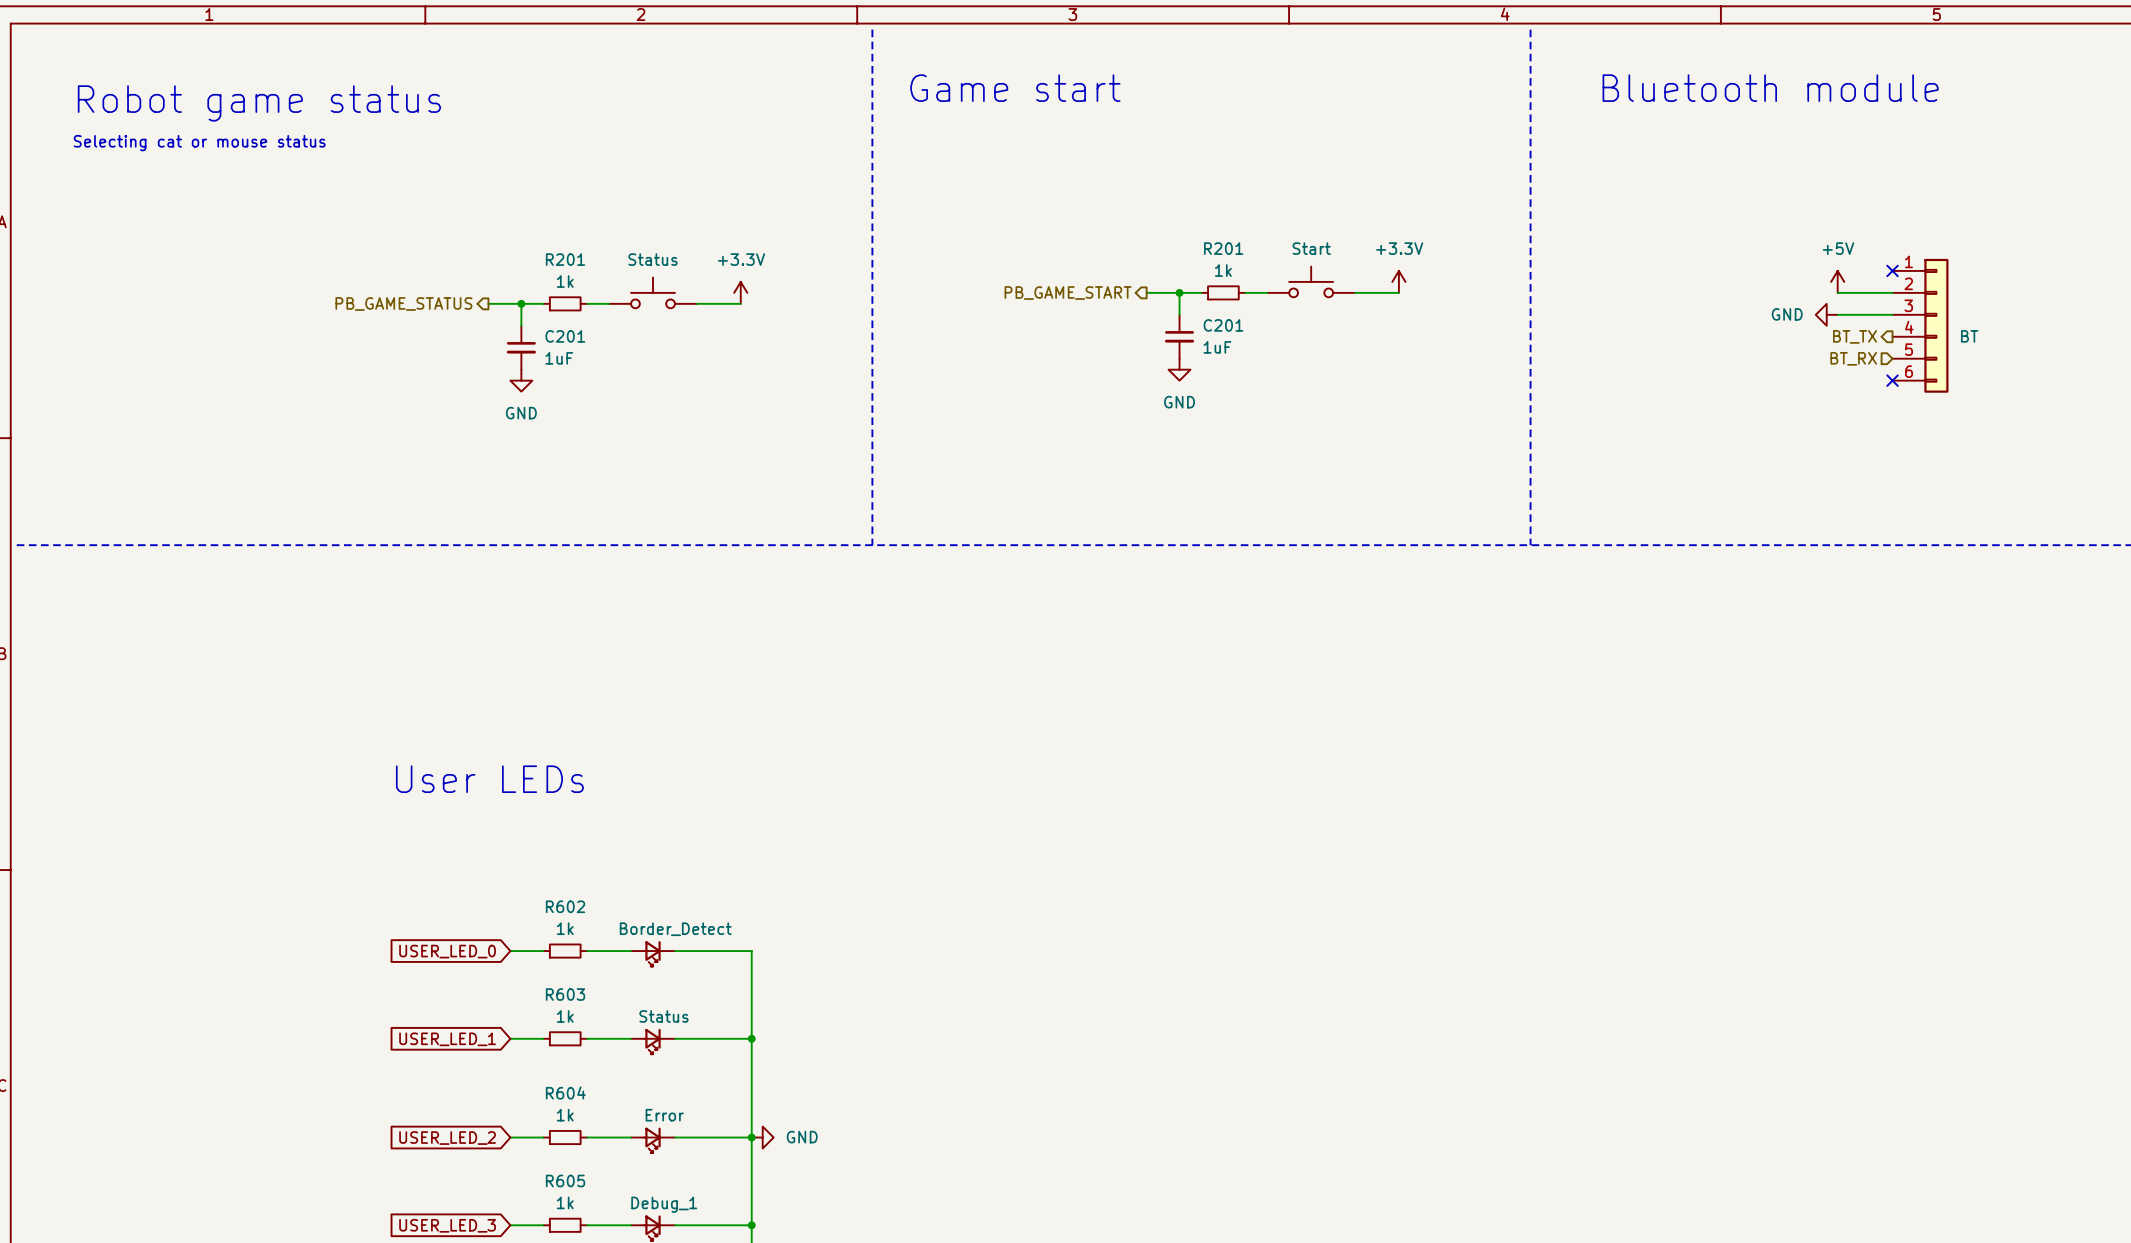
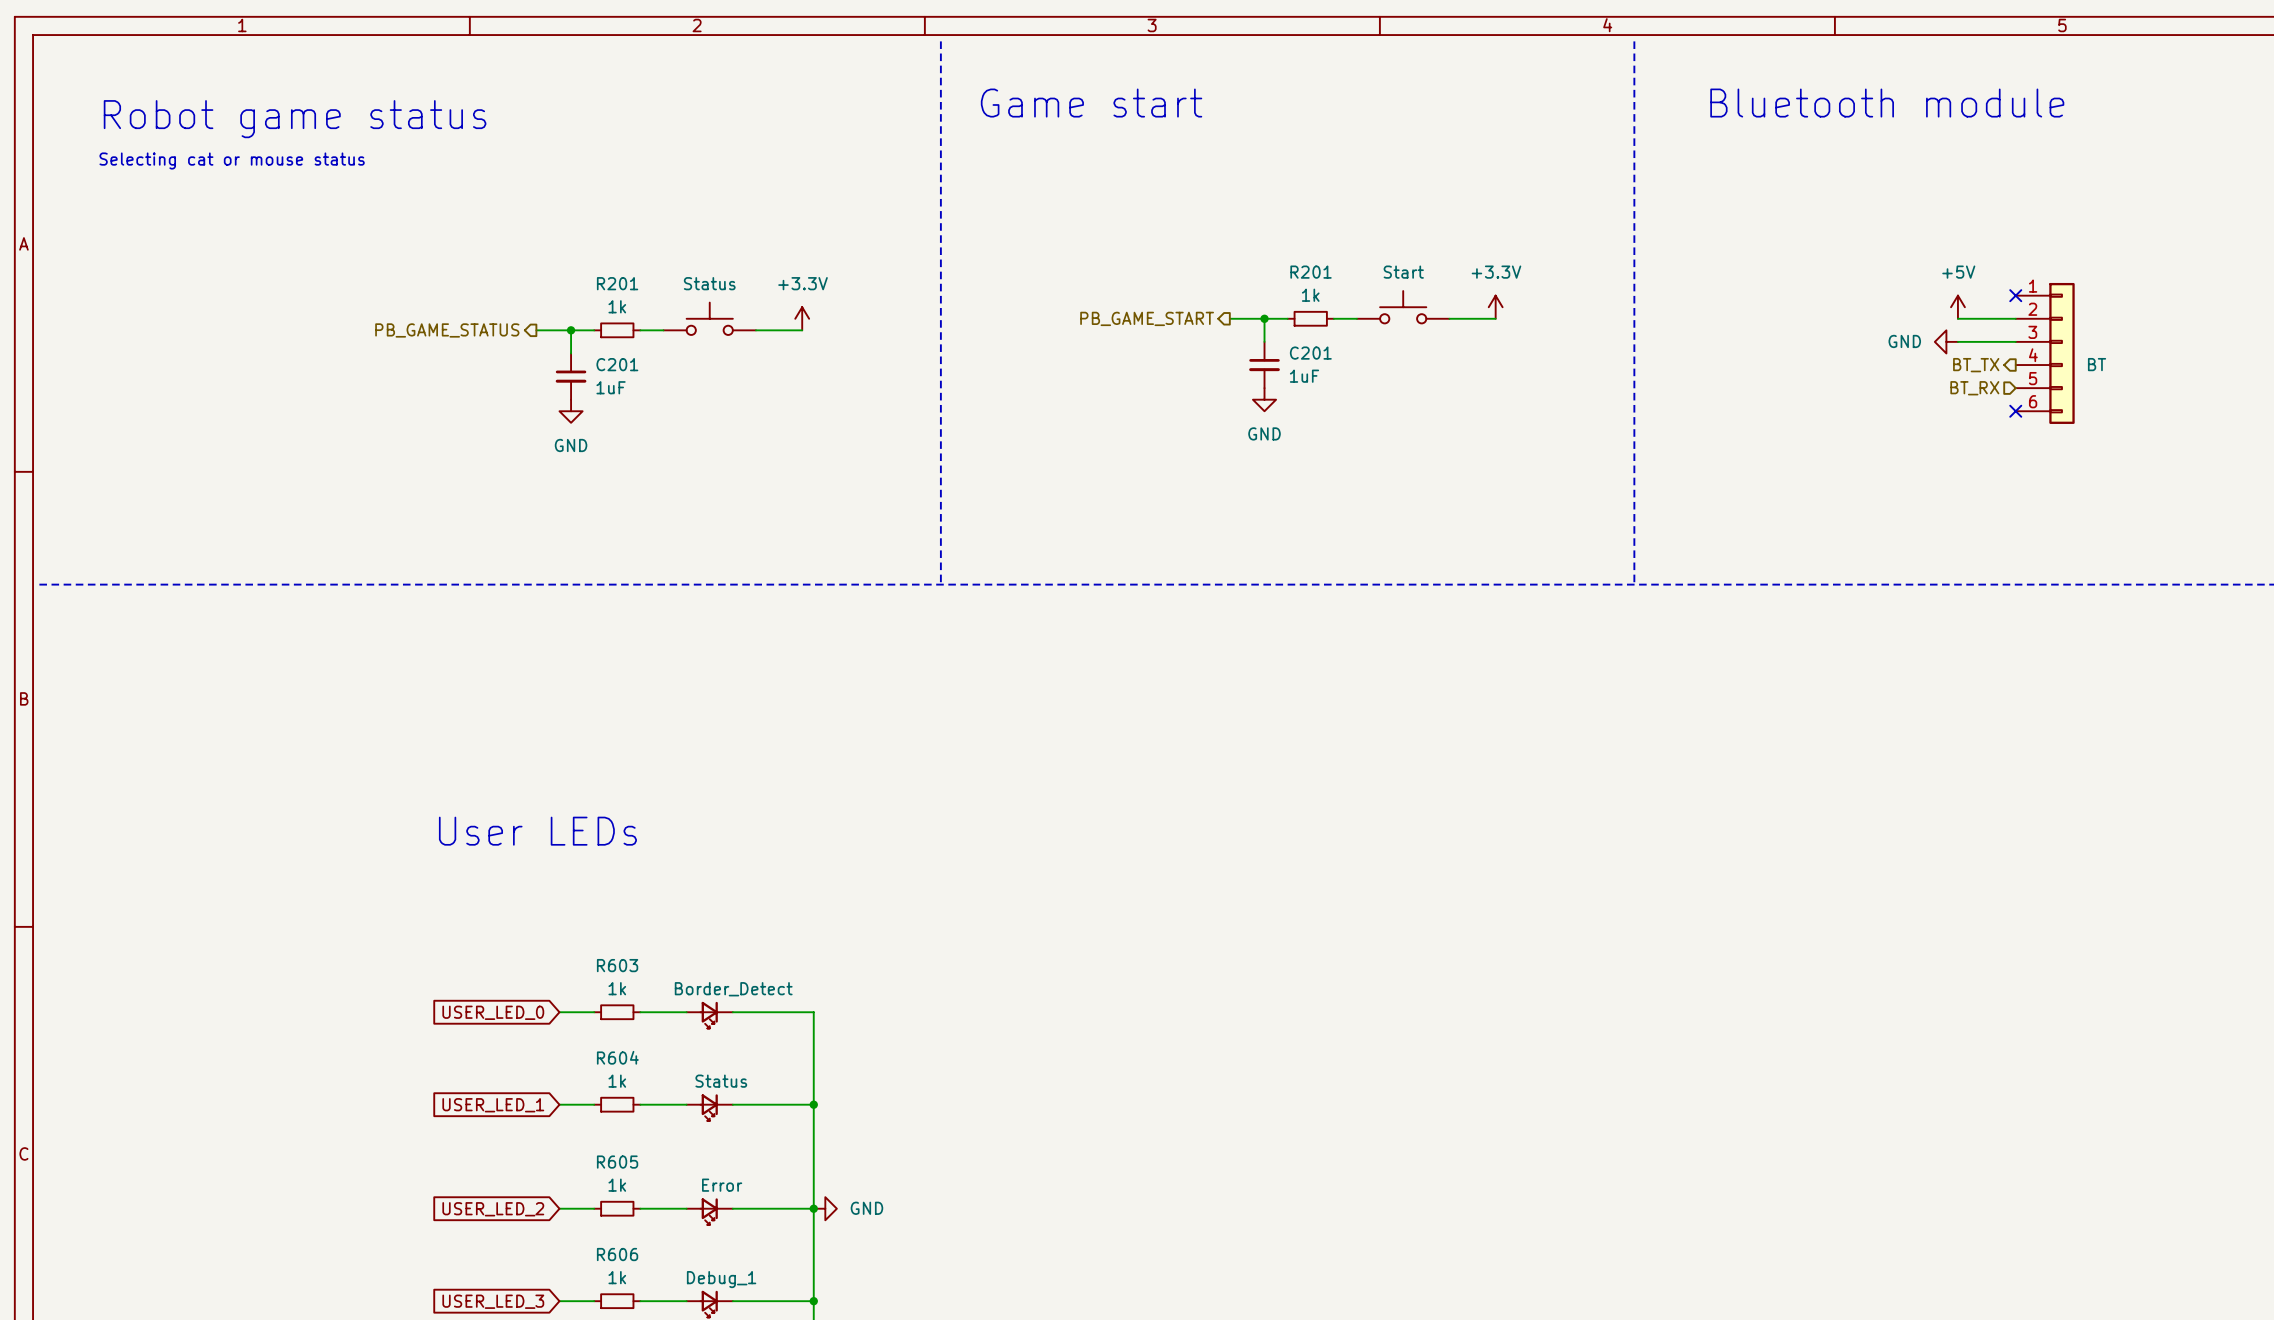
R602 name: R602 (565, 906) -> R603 (617, 965)
R603 name: R603 (565, 994) -> R604 (617, 1057)
R604 name: R604 (565, 1092) -> R605 (617, 1162)
R605 name: R605 (565, 1180) -> R606 (617, 1254)

